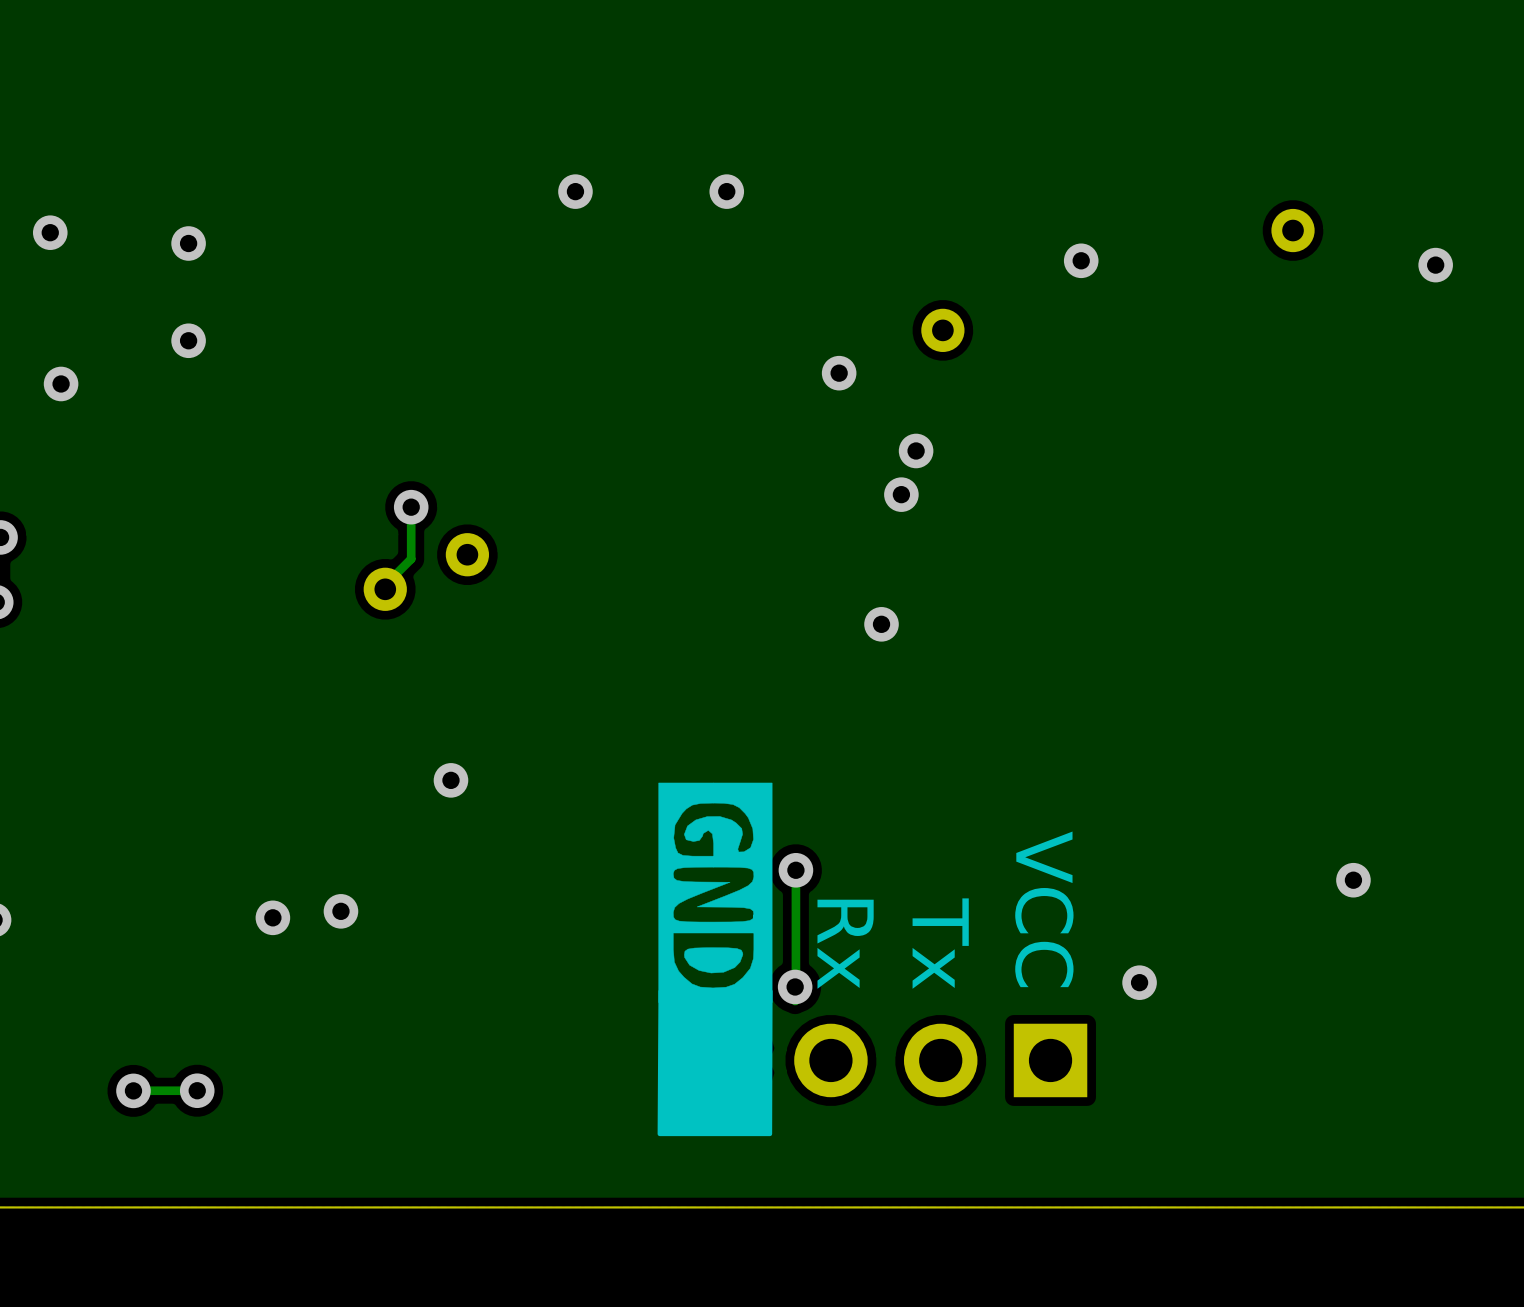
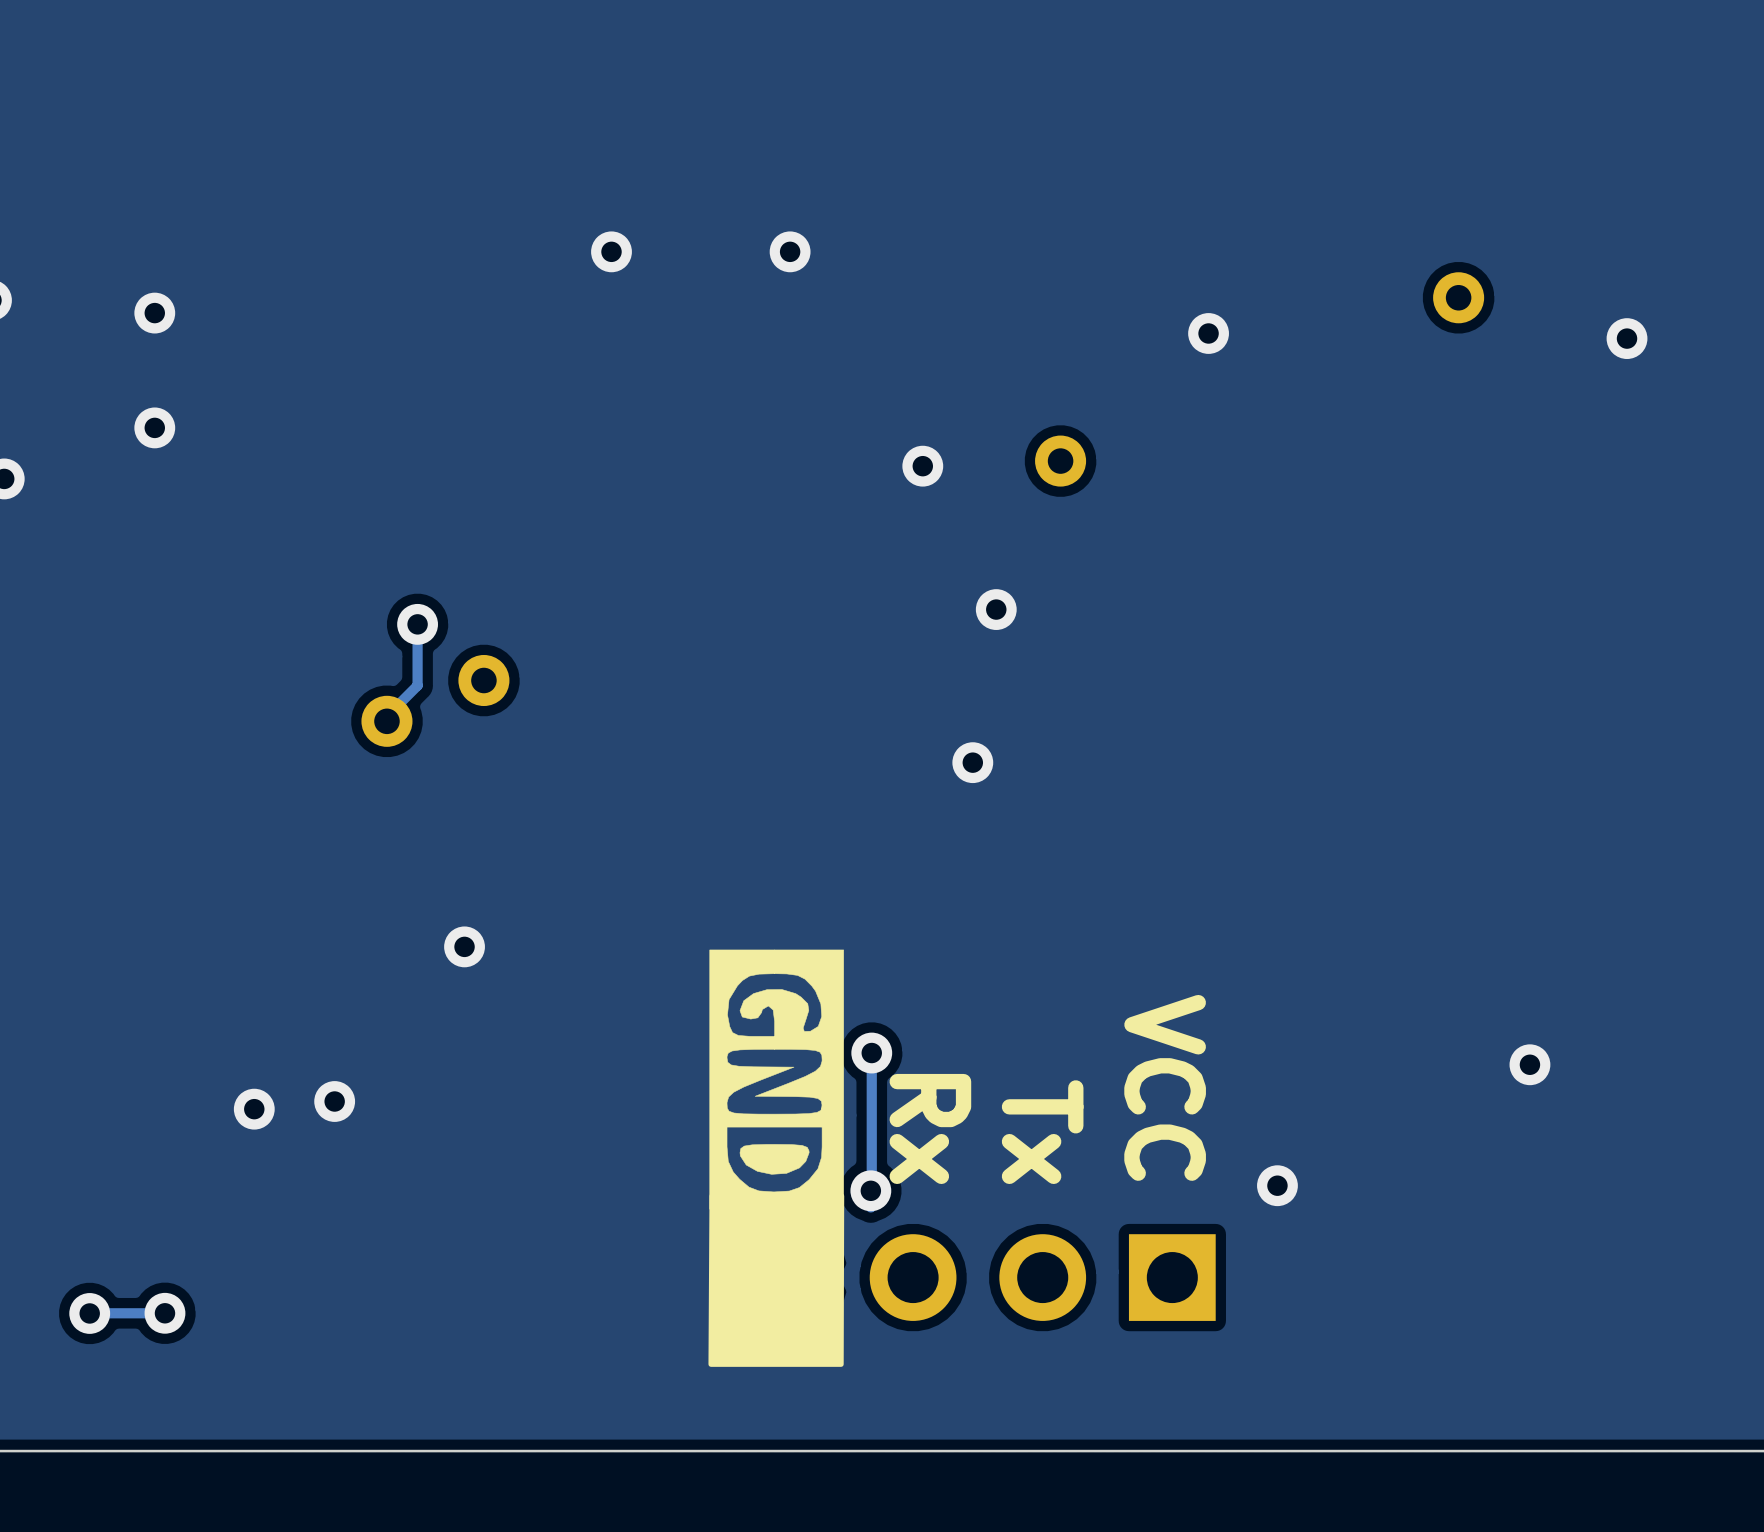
part position: (942, 330) -> (1060, 461)
via: (916, 450) -> none

